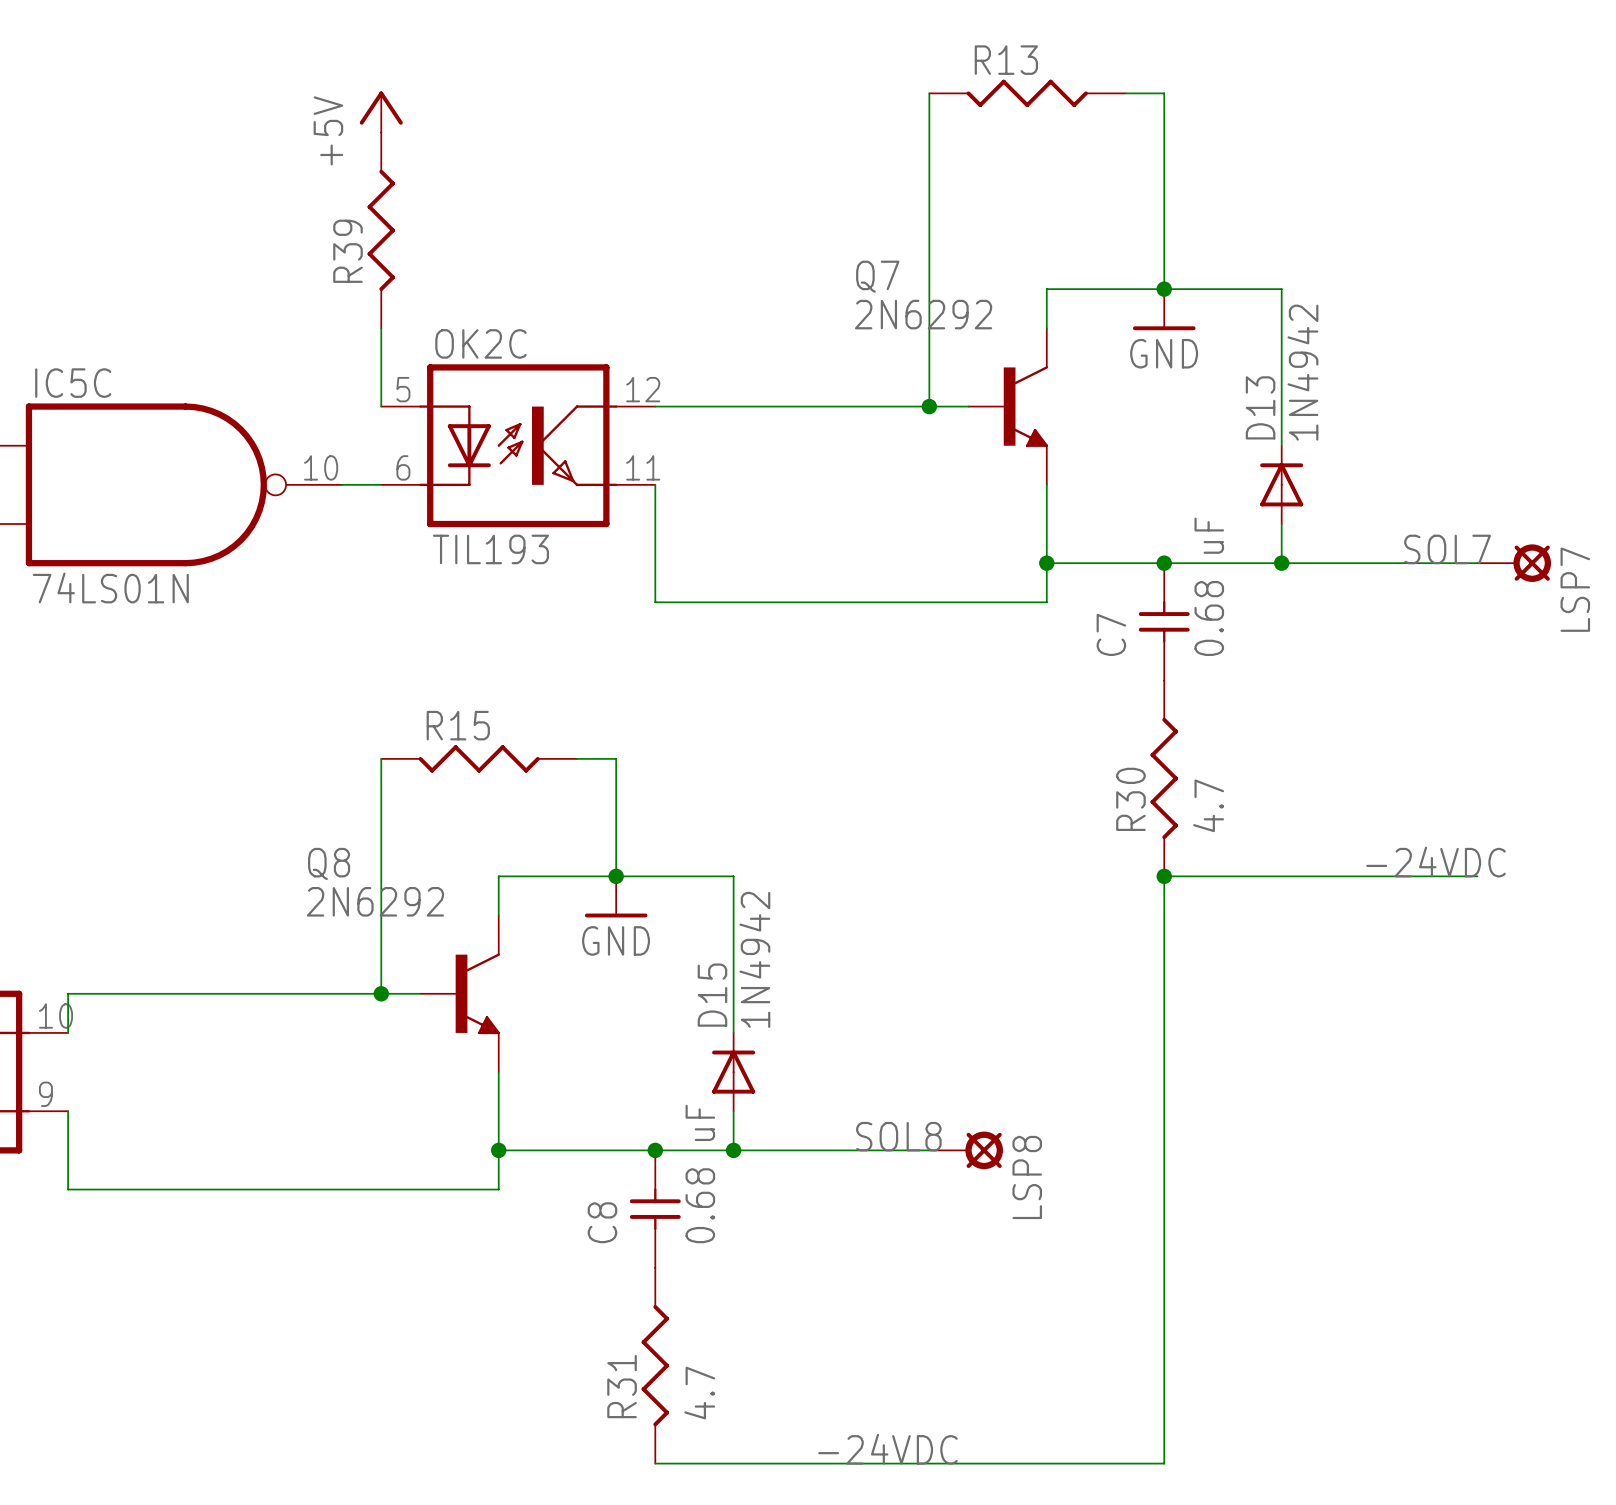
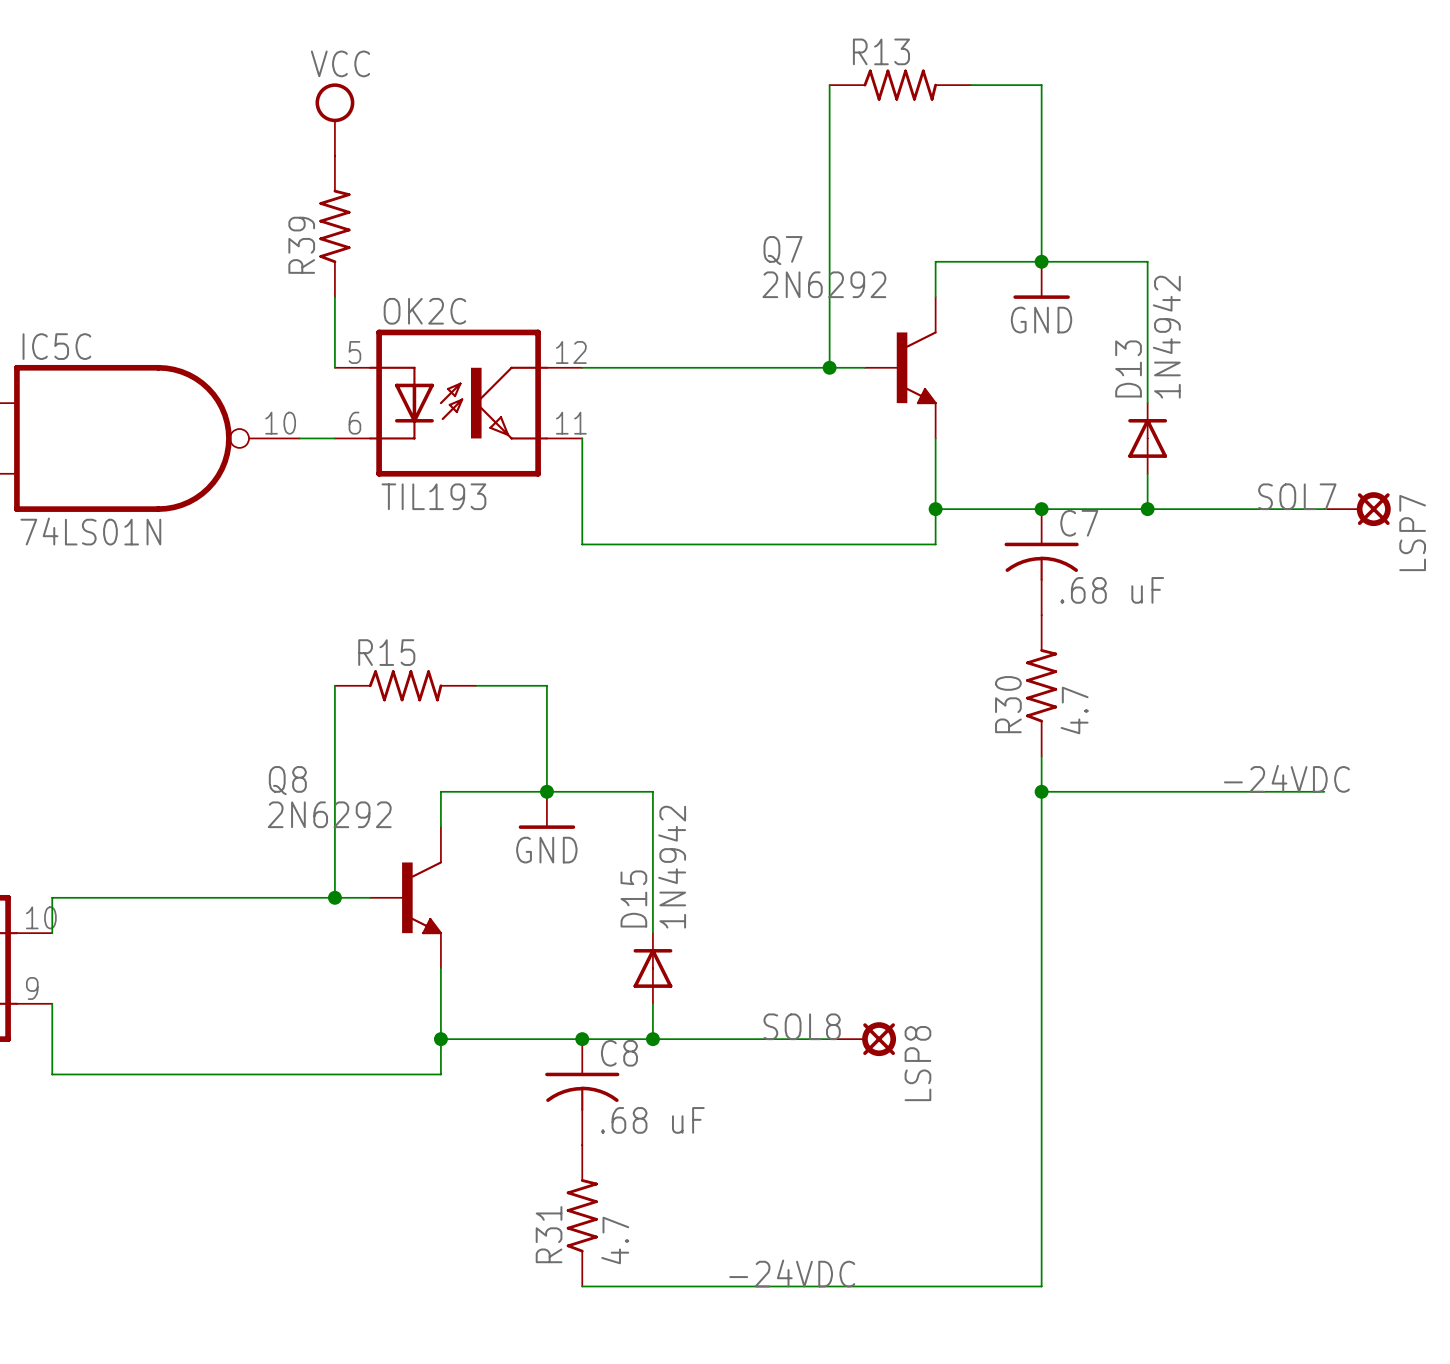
R13 symbol: [929, 79, 1126, 108] -> [829, 69, 971, 101]
power symbol: +5V (381, 111) -> none
power symbol: none -> VCC (334, 119)
R39 symbol: [367, 132, 395, 329] -> [319, 155, 351, 298]
C7 symbol: [1138, 563, 1190, 681] -> [1004, 509, 1079, 616]
C7 value: 0.68 uF (1209, 586) -> .68 uF (1112, 590)
C7 name position: C7 (1111, 634) -> C7 (1079, 523)
R30 symbol: [1150, 680, 1178, 877] -> [1026, 615, 1058, 757]
R15 symbol: [381, 745, 578, 773] -> [334, 670, 477, 702]
C8 symbol: [629, 1150, 681, 1268] -> [545, 1039, 620, 1146]
C8 value: 0.68 uF (700, 1174) -> .68 uF (652, 1120)
C8 name position: C8 (602, 1222) -> C8 (619, 1053)
R31 symbol: [641, 1267, 670, 1464] -> [566, 1145, 598, 1287]
wire: (1164, 1424) (1164, 1463) (655, 1463) -> (1041, 1286) (582, 1286)
label position: -24VDC (887, 1449) -> -24VDC (792, 1273)

